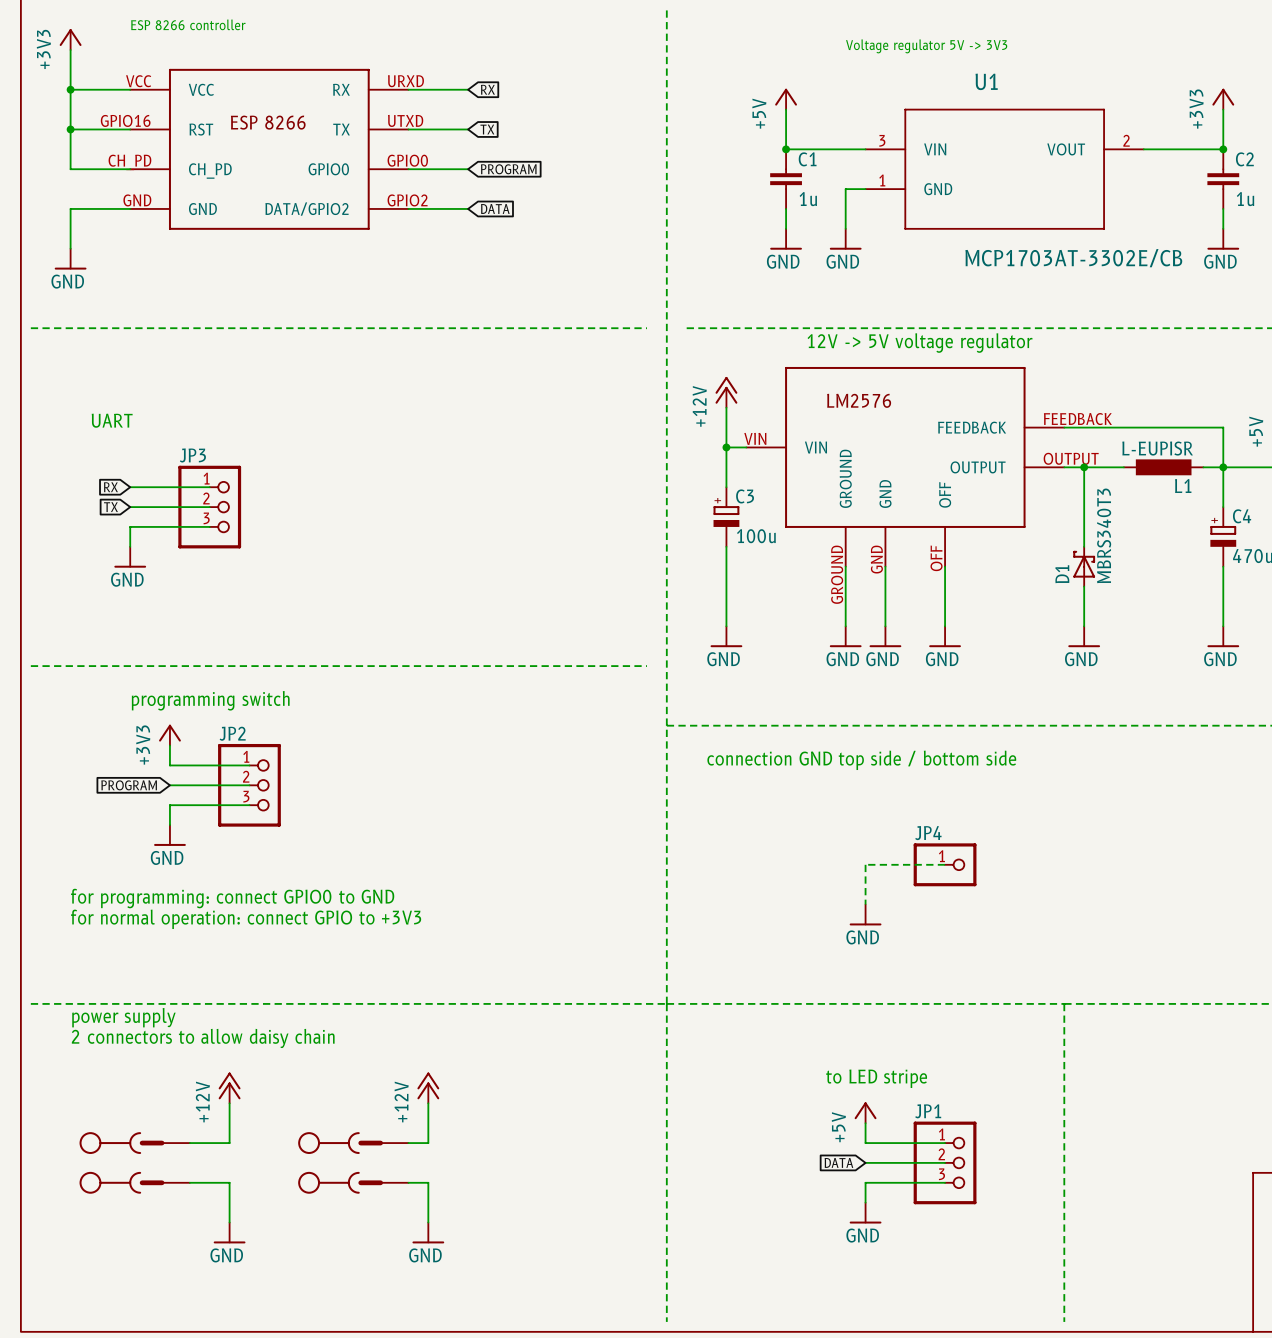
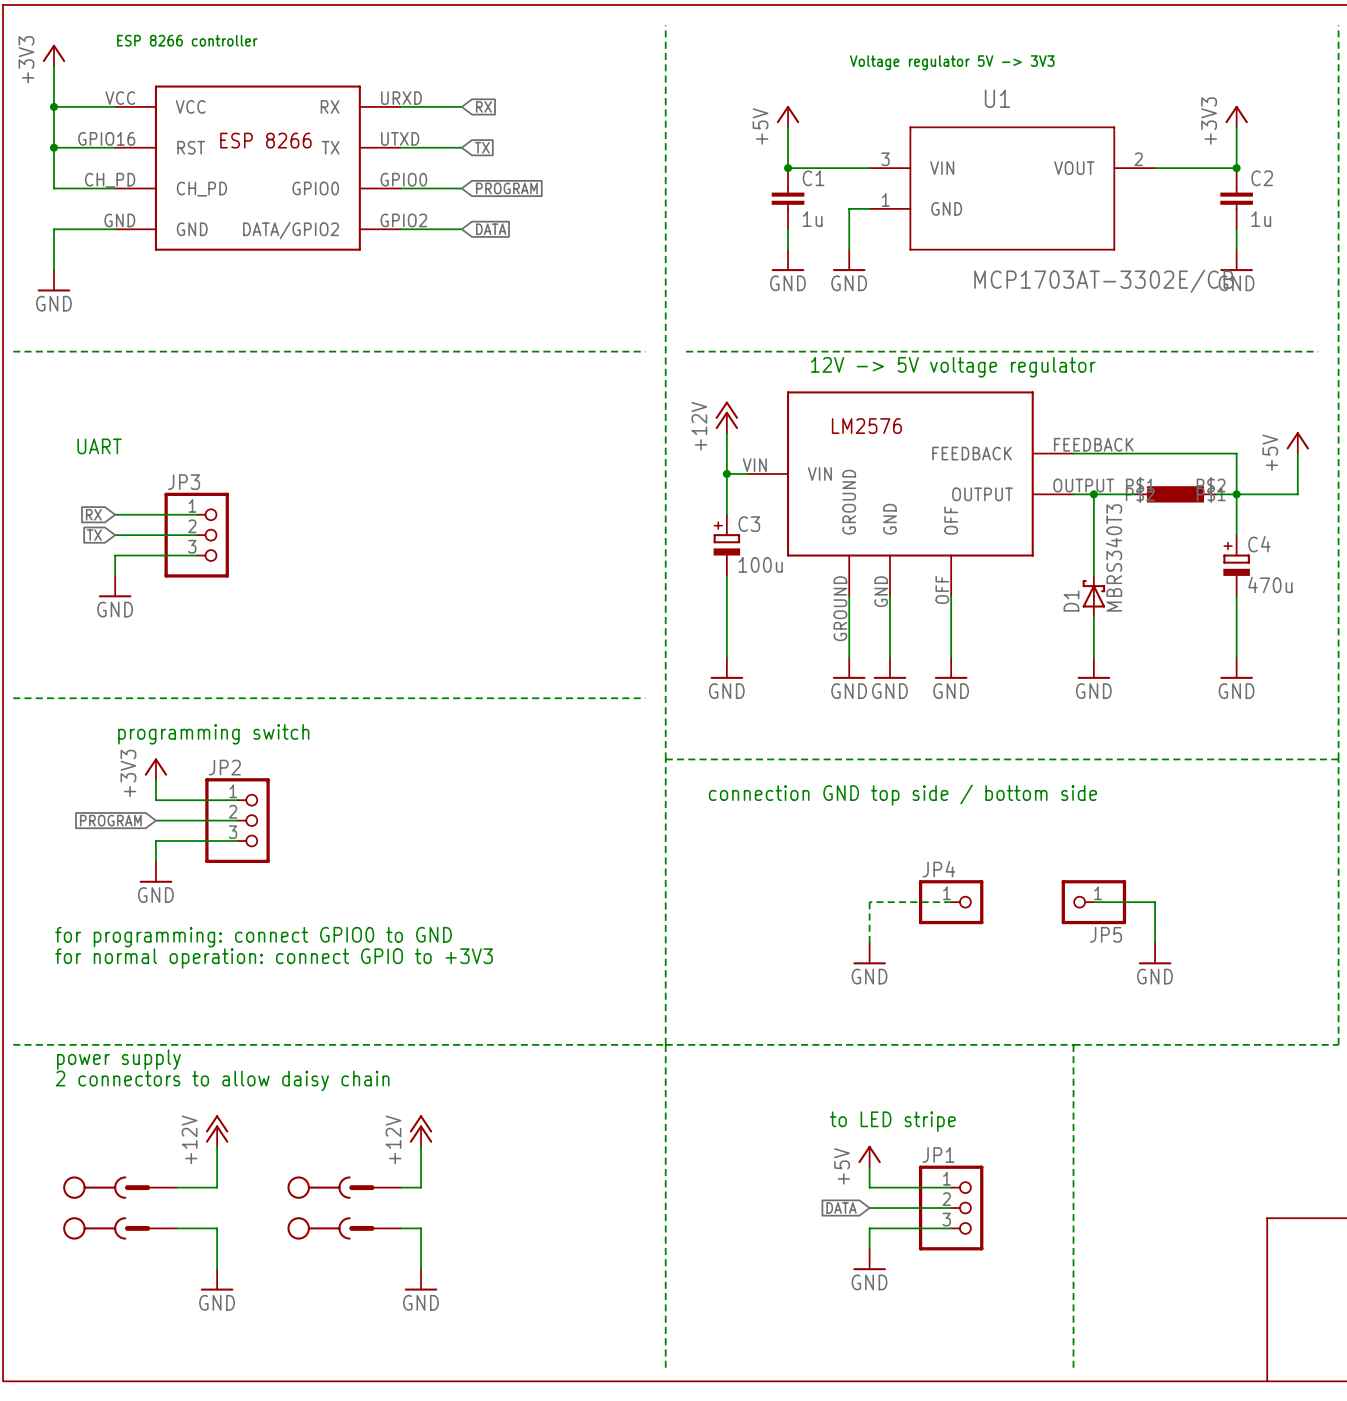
L1: L-EUPISR (1163, 467) -> none
part: none -> (1175, 494)
wire: none -> (1093, 902) (1155, 902) (1155, 942)
JP5: none -> (1093, 902)
power symbol: none -> GND (1155, 953)

